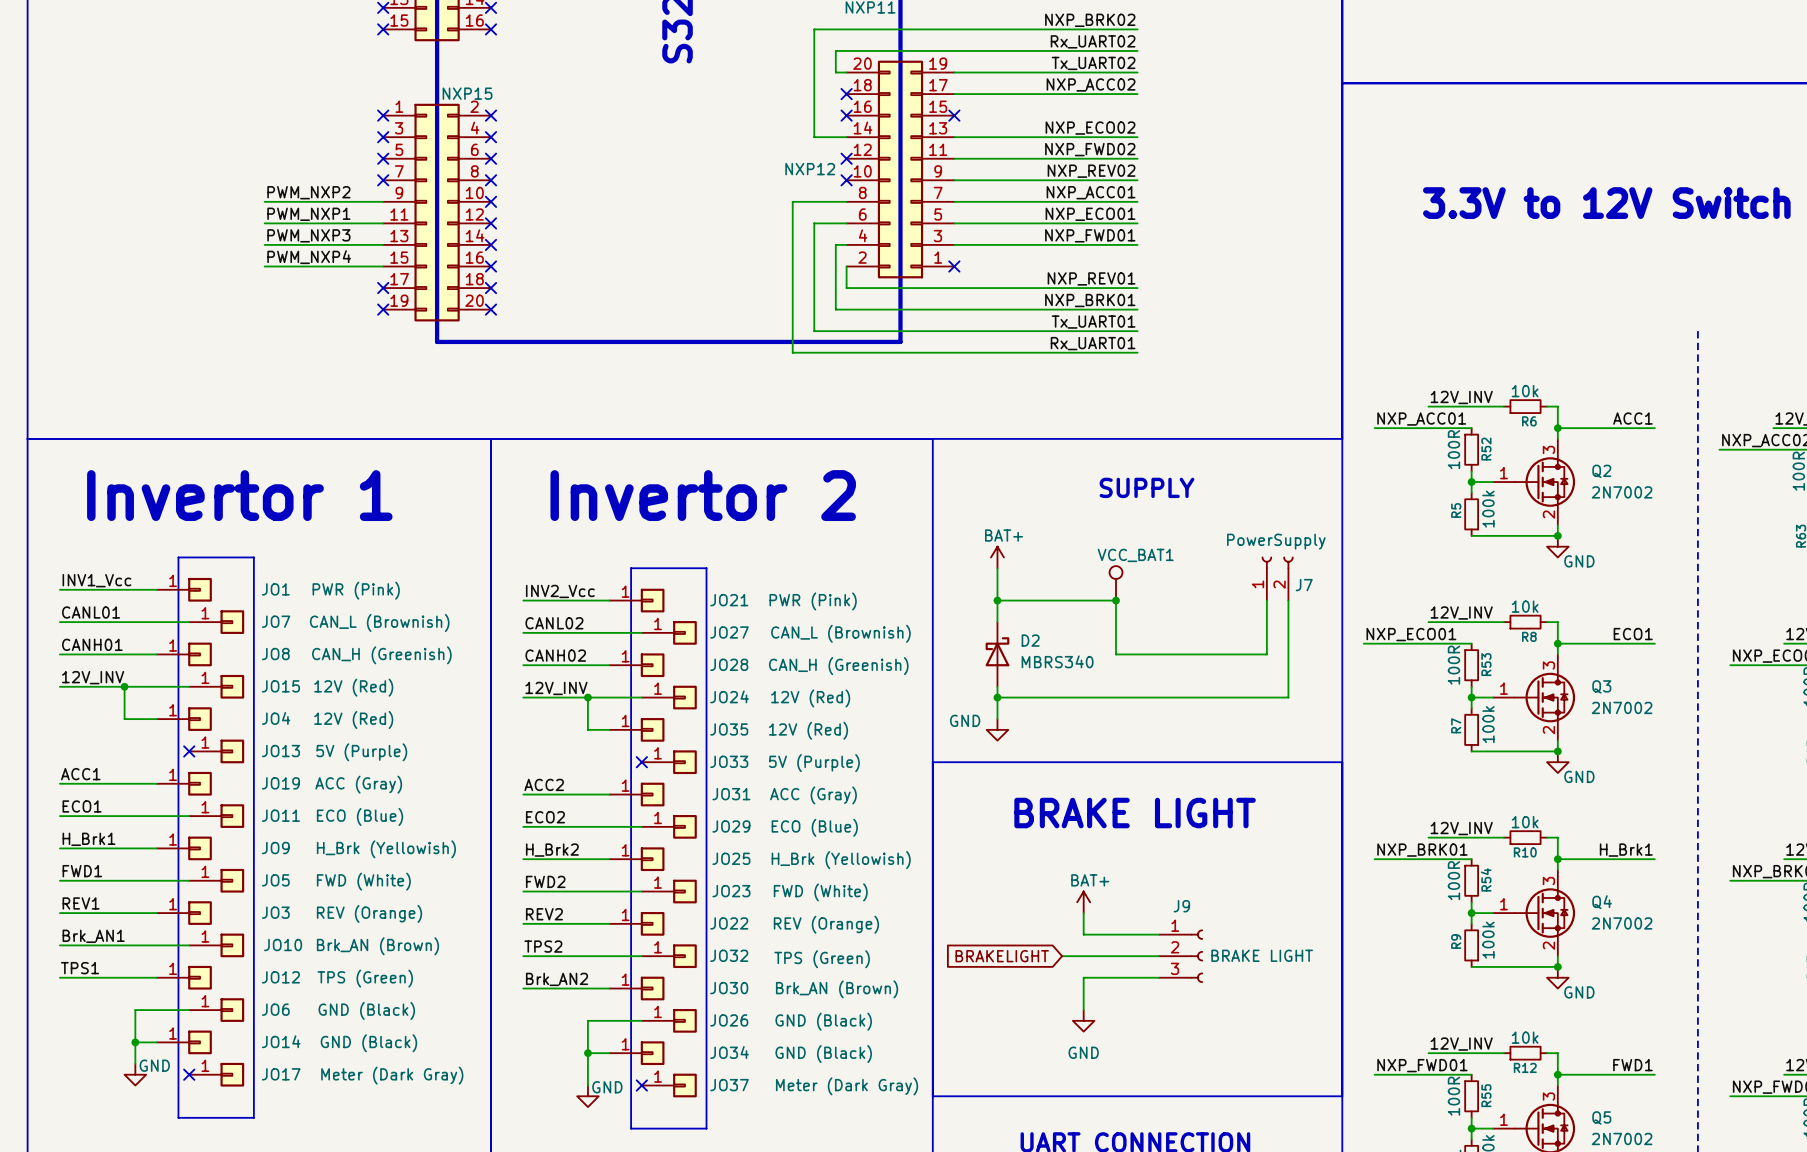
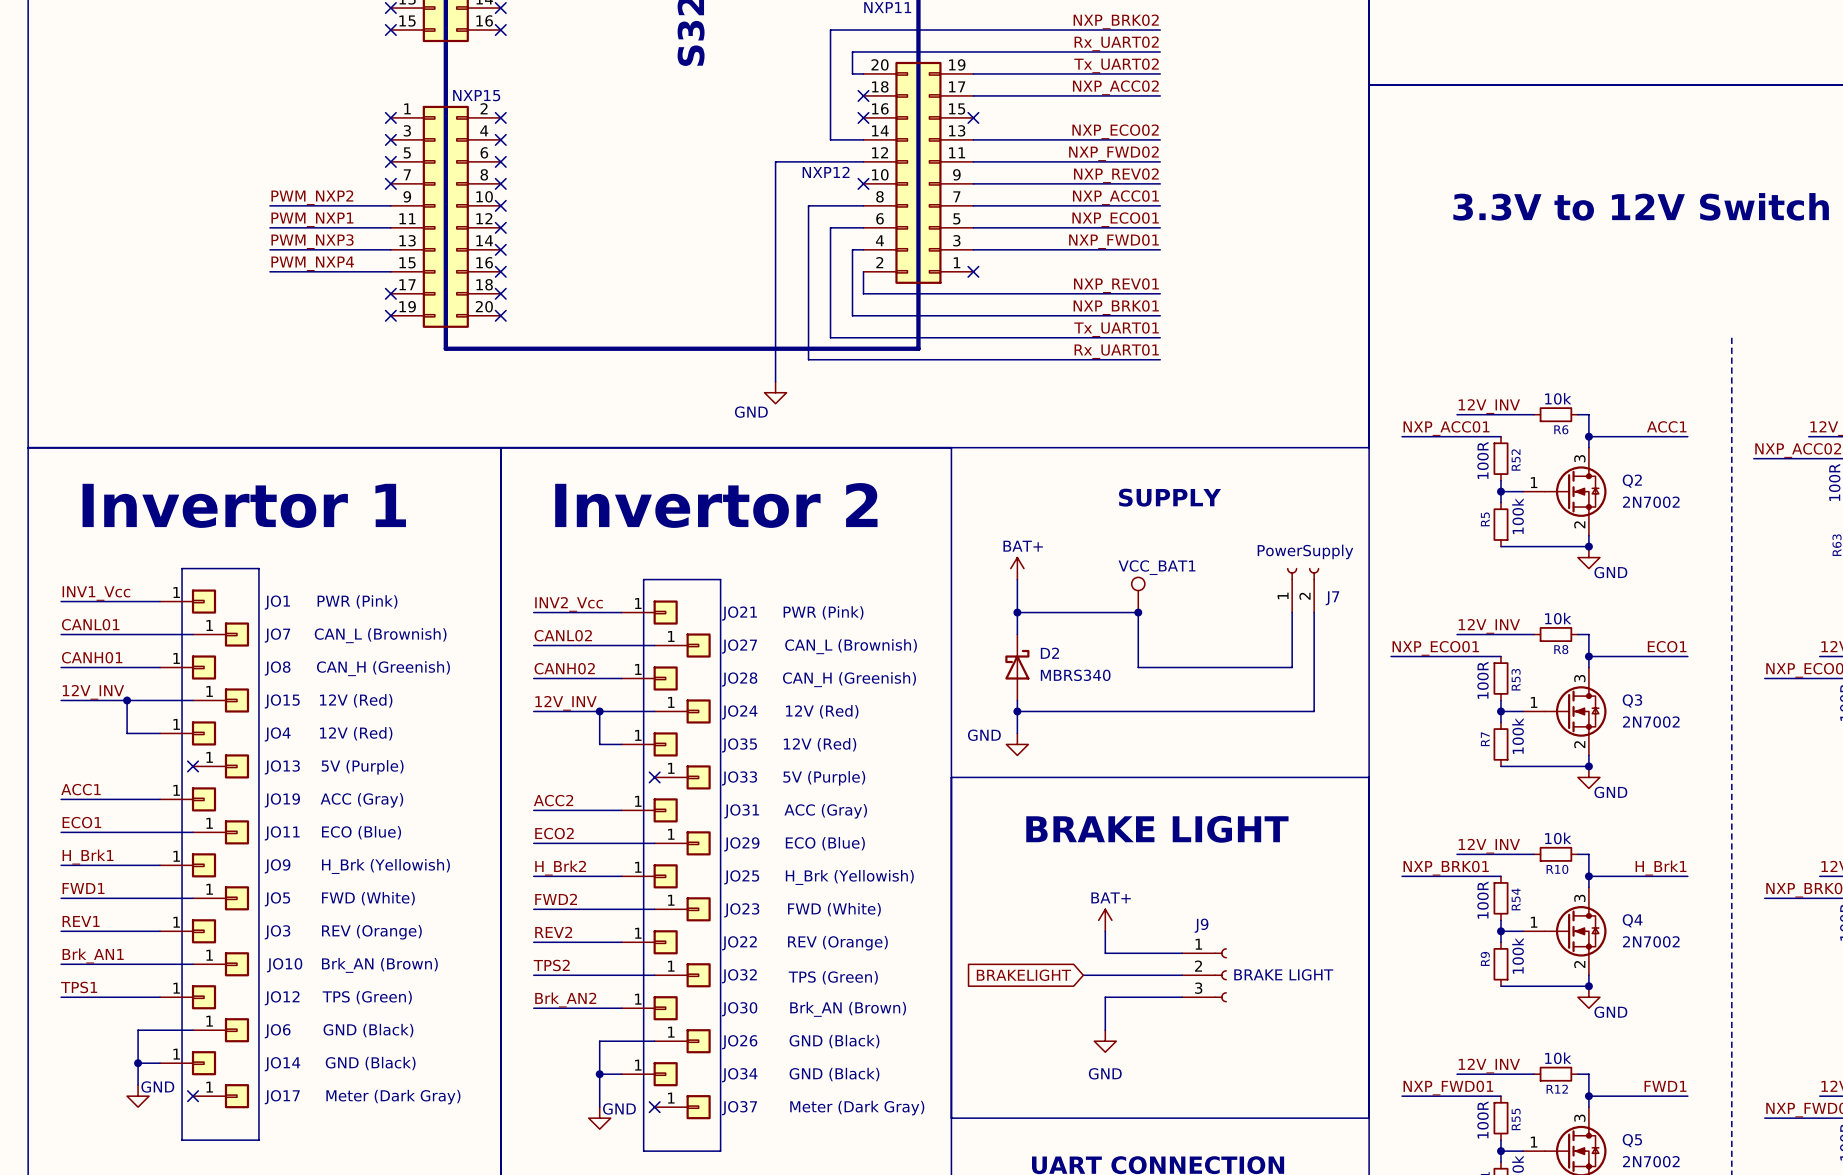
wire: none -> (863, 161) (775, 161) (775, 381)
no-connect mark: (846, 158) -> none
power symbol: none -> GND (775, 392)

